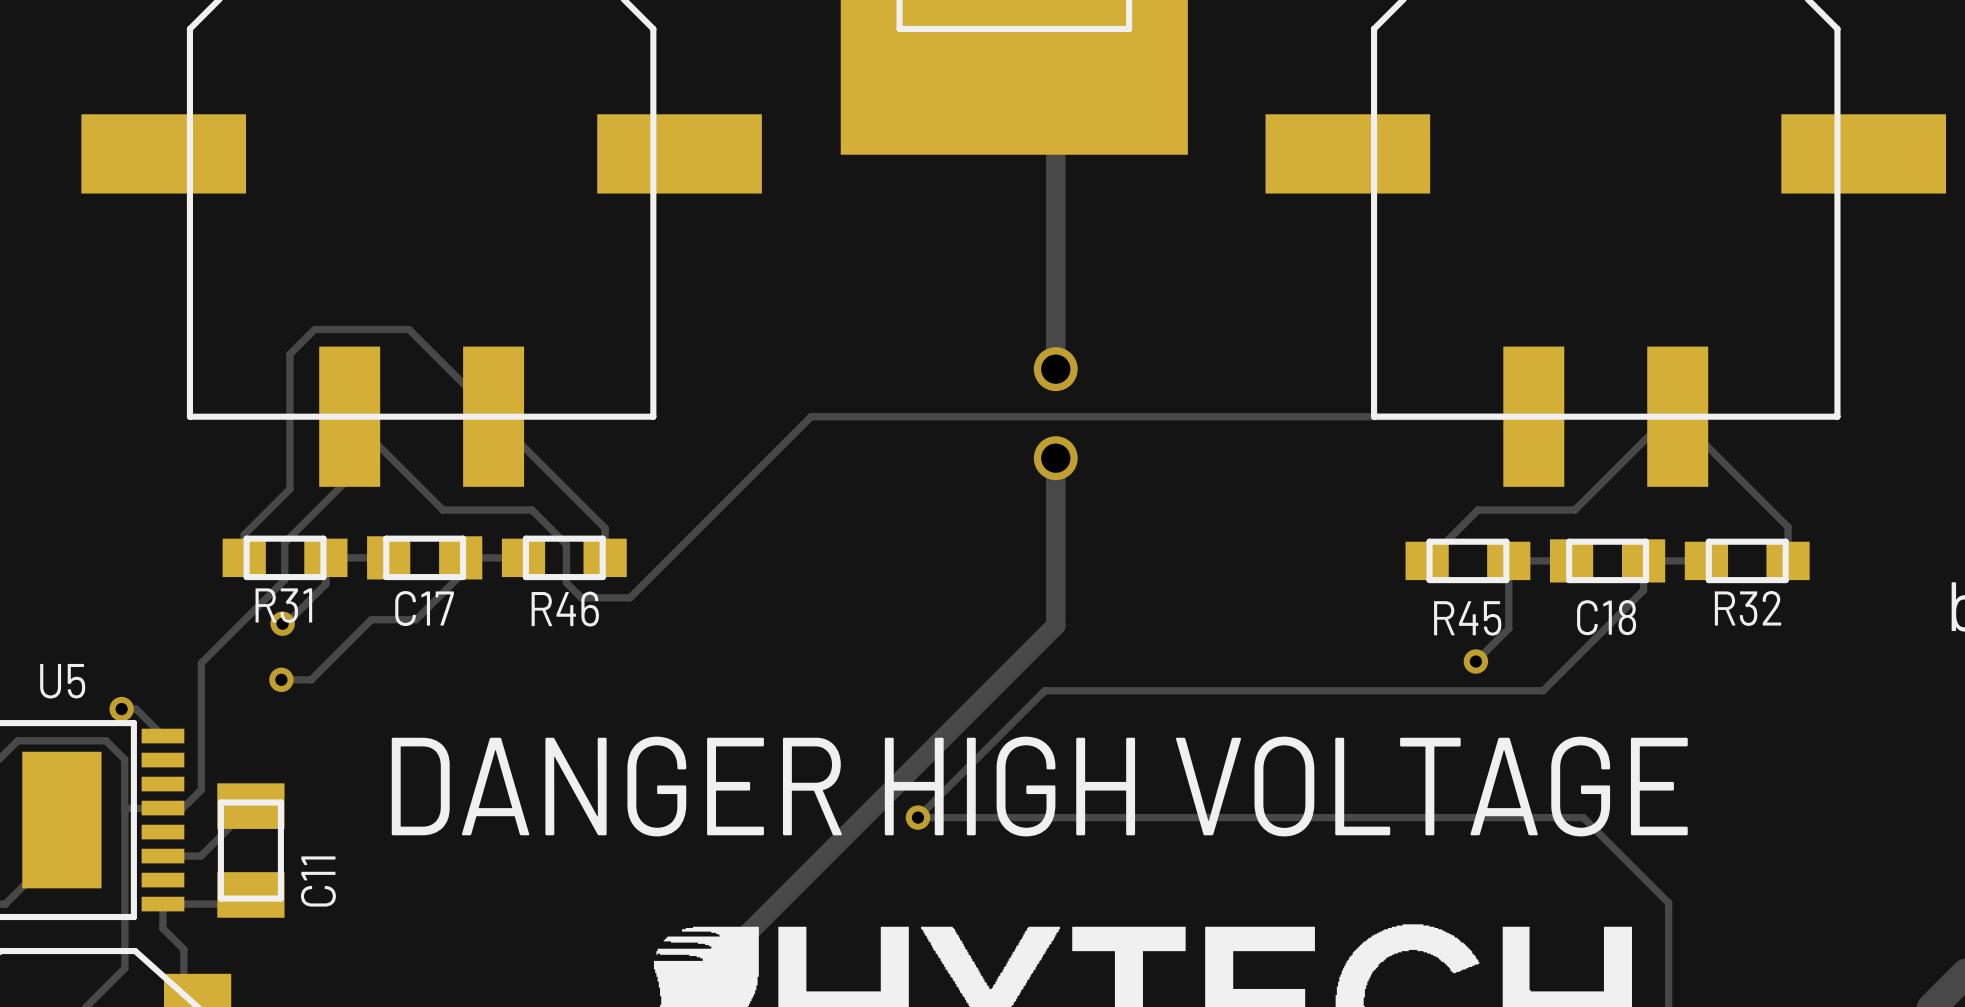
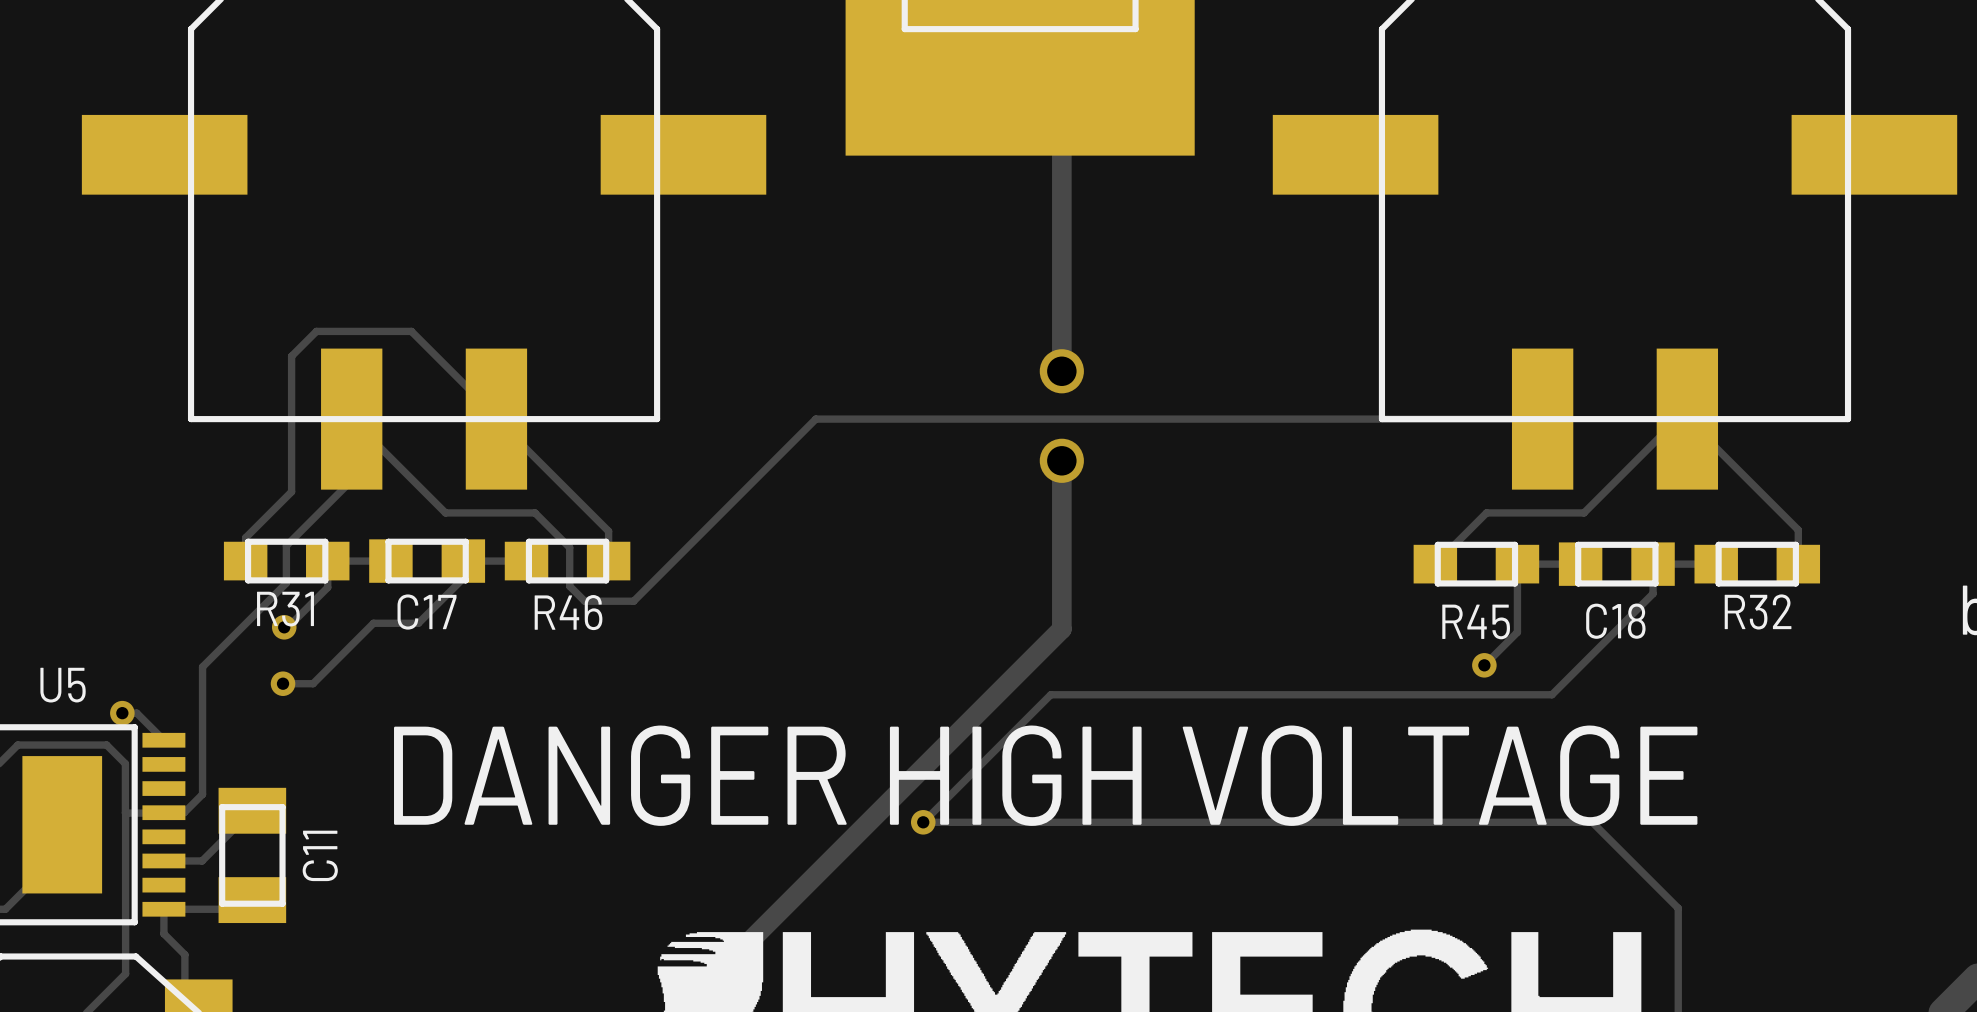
drawing position: (1039, 786) -> (1045, 775)
C11 name position: C11 (318, 881) -> C11 (320, 855)

